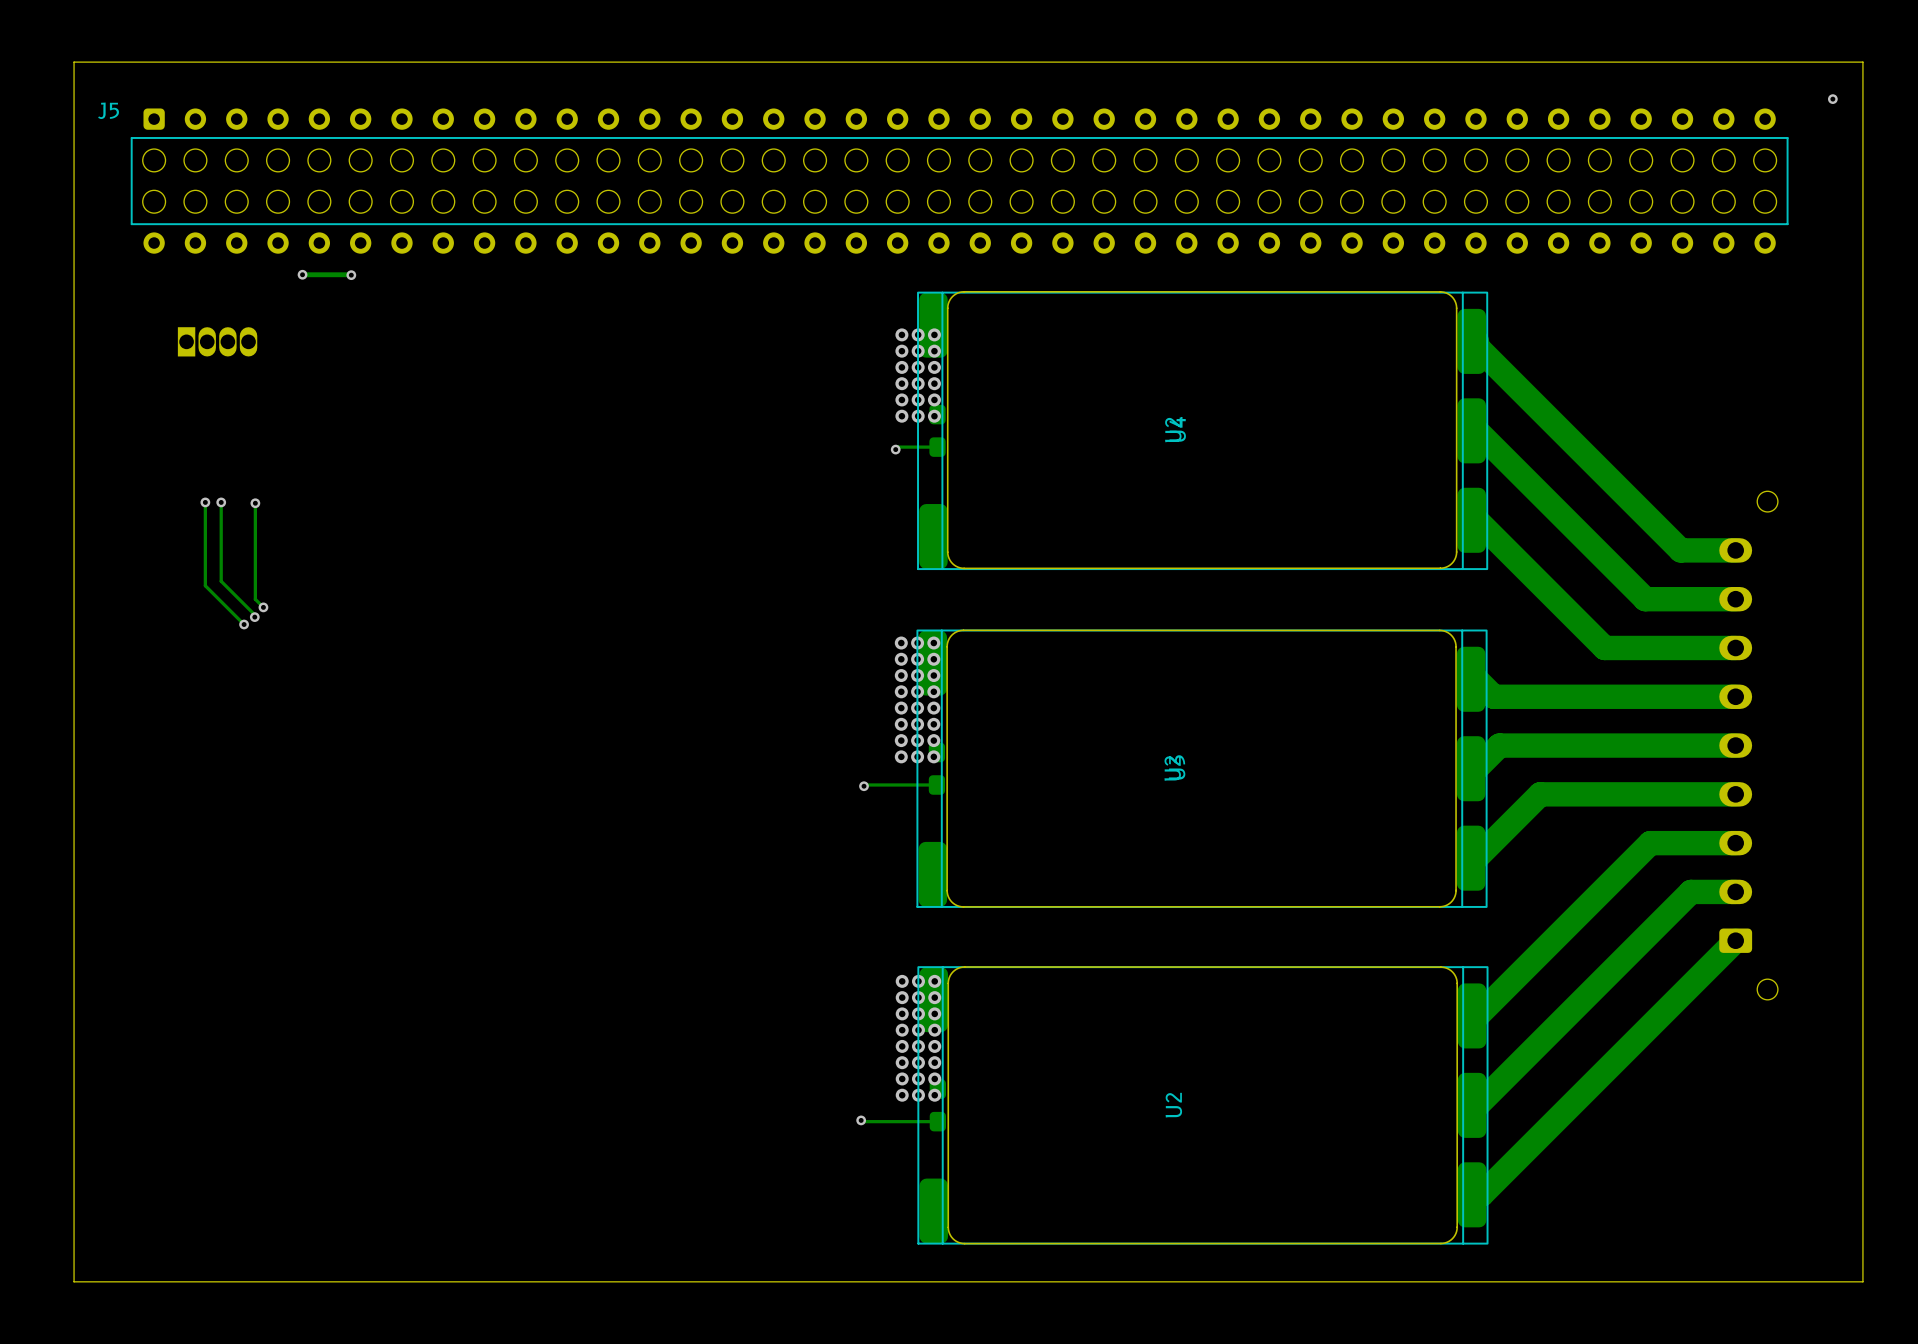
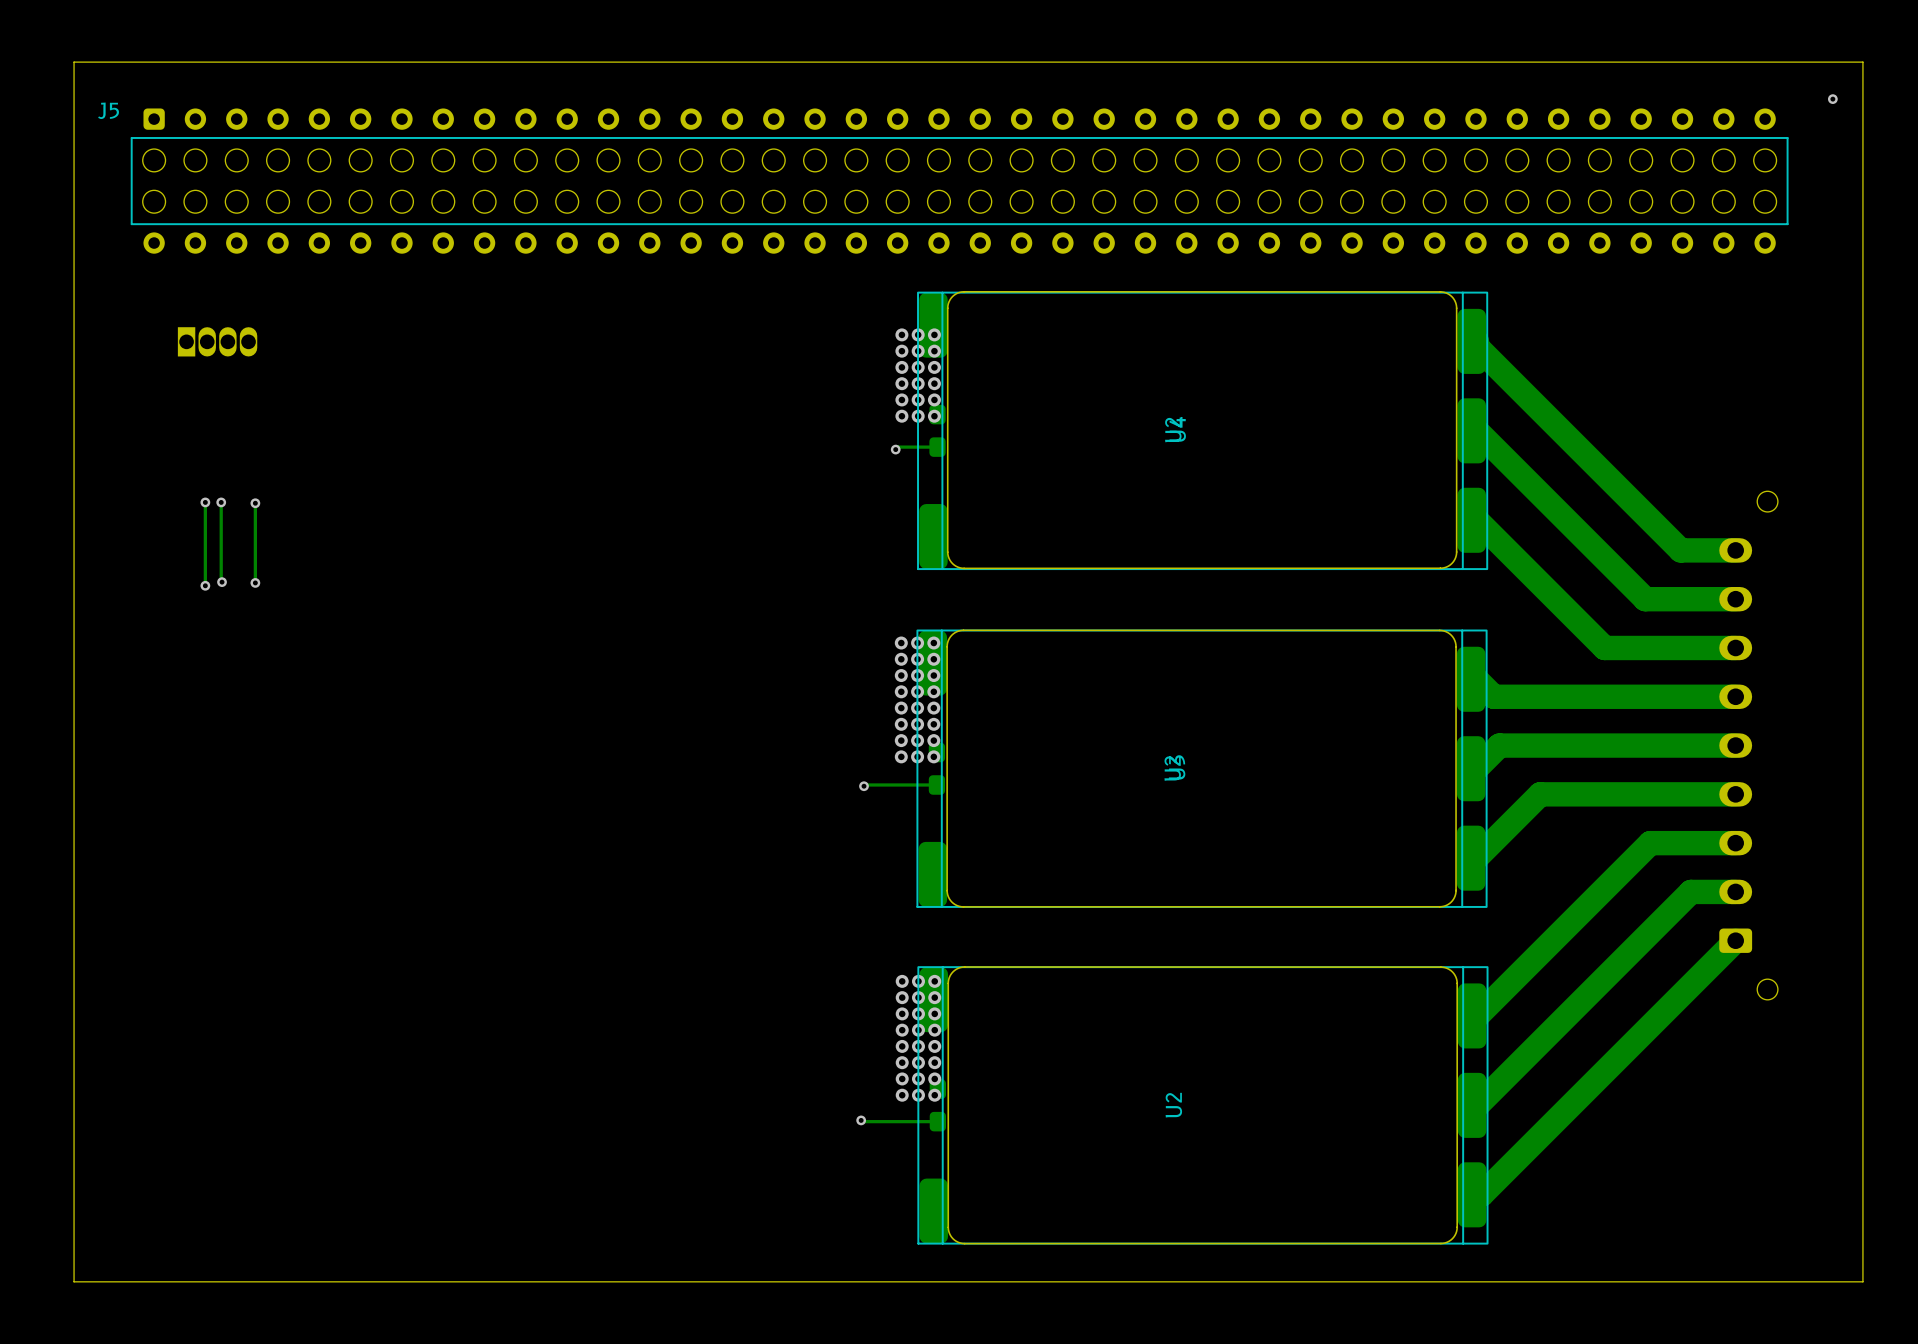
track: (302, 274) (351, 275) -> none
via: (302, 274) -> none
via: (351, 275) -> none
track: (222, 582) (254, 614) (254, 617) -> none
via: none -> (222, 582)
track: (255, 582) (255, 599) (263, 607) -> none
via: none -> (255, 582)
track: (205, 585) (244, 624) -> none
via: none -> (205, 585)
via: (263, 607) -> none
via: (254, 617) -> none
via: (244, 624) -> none

